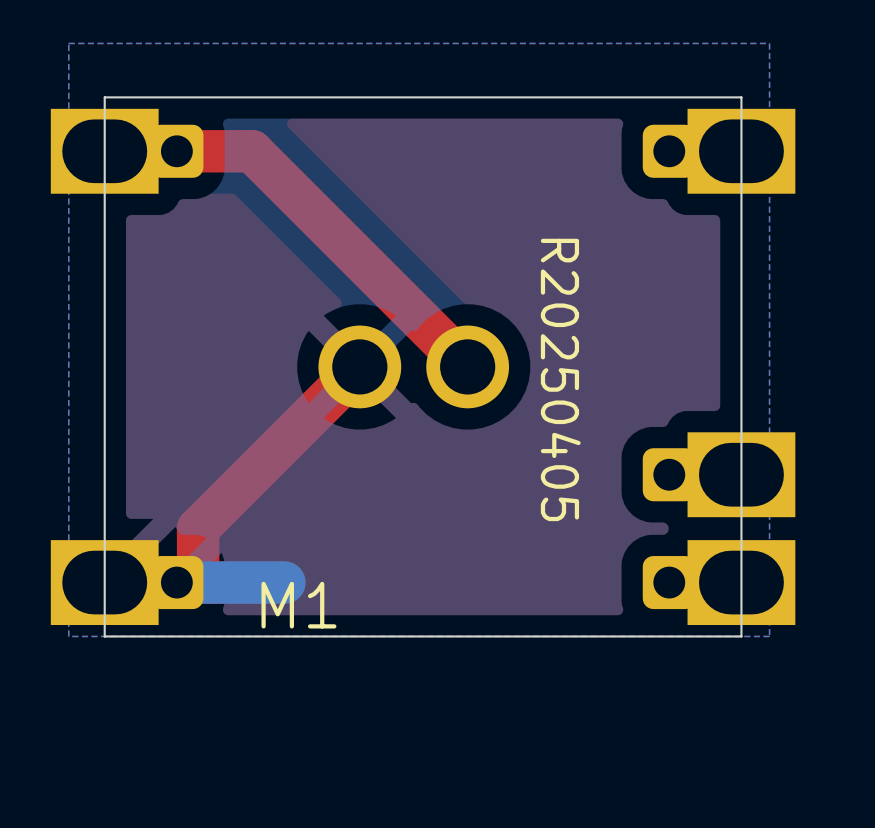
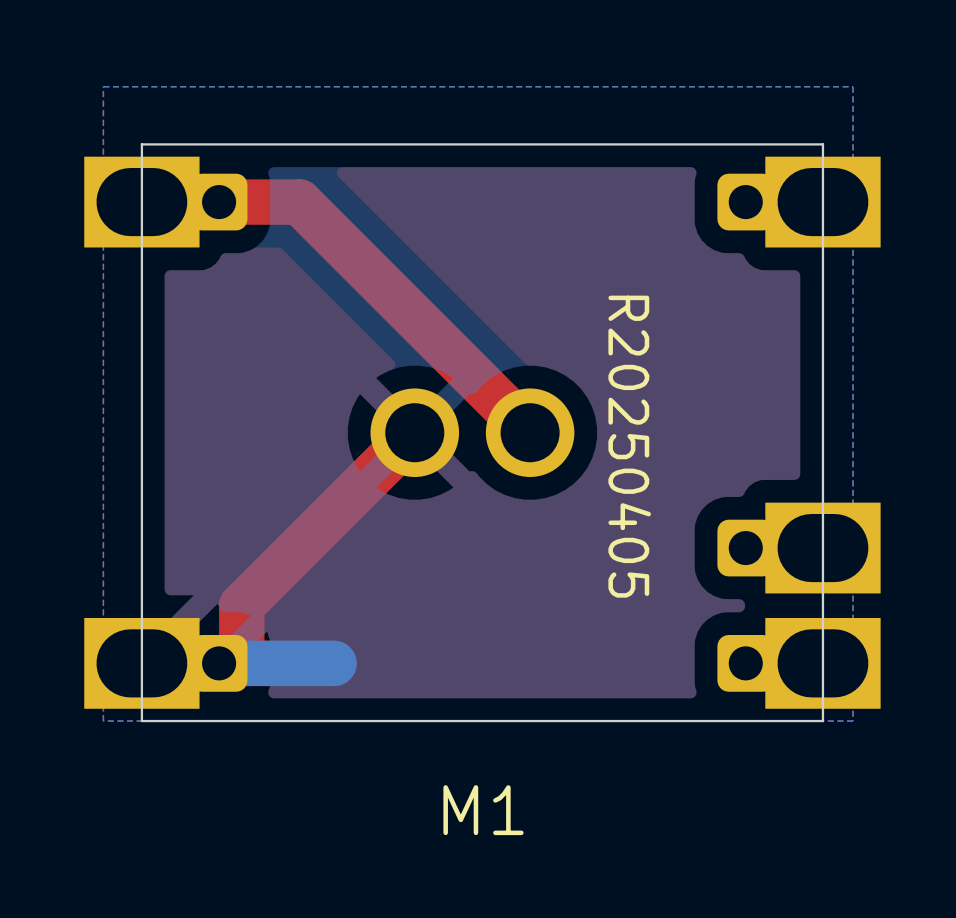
M1 name position: M1 (298, 605) -> M1 (483, 810)

